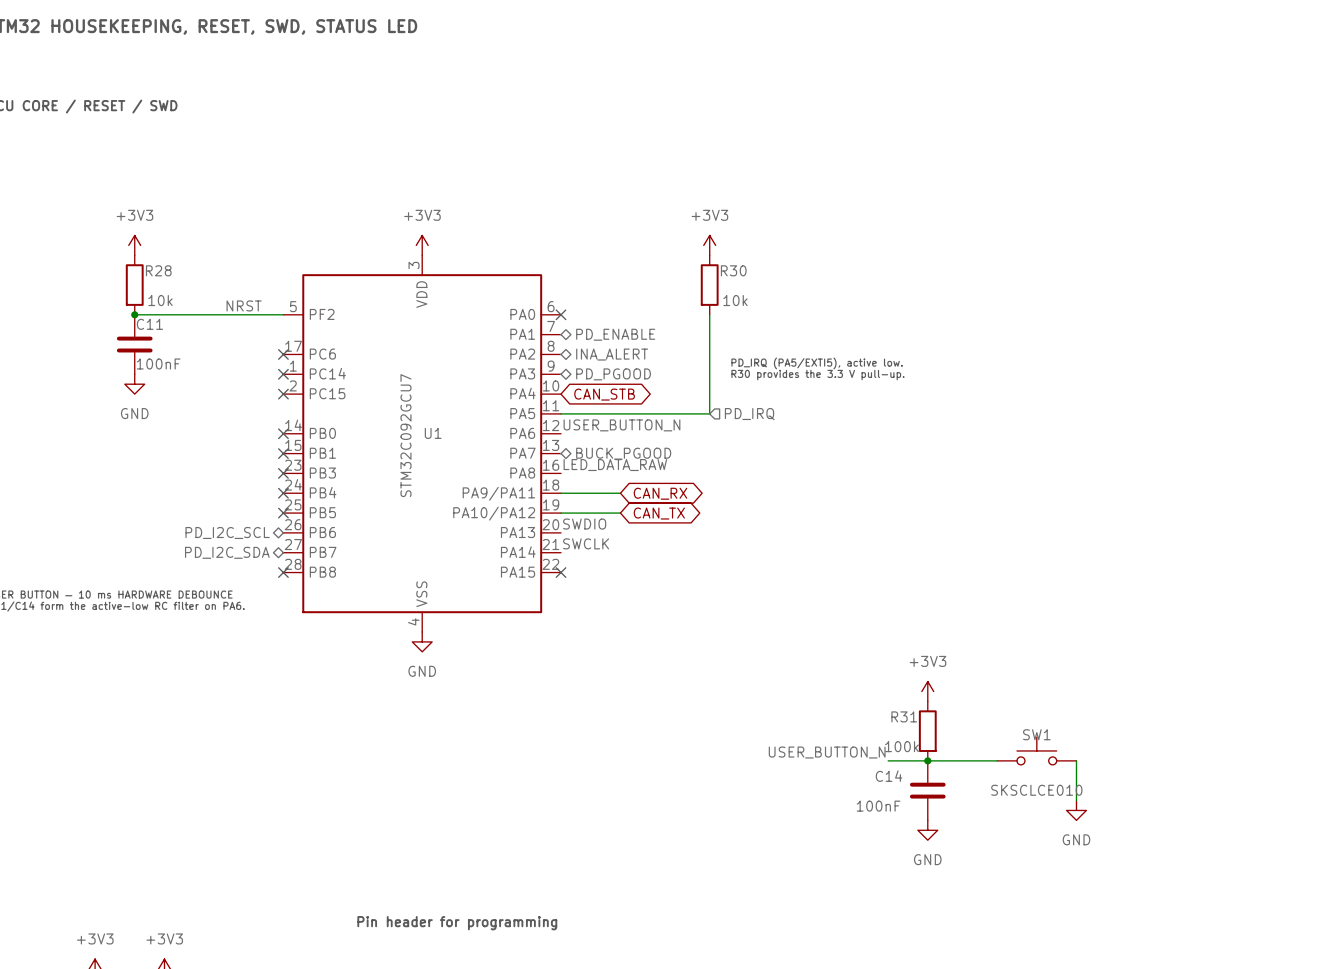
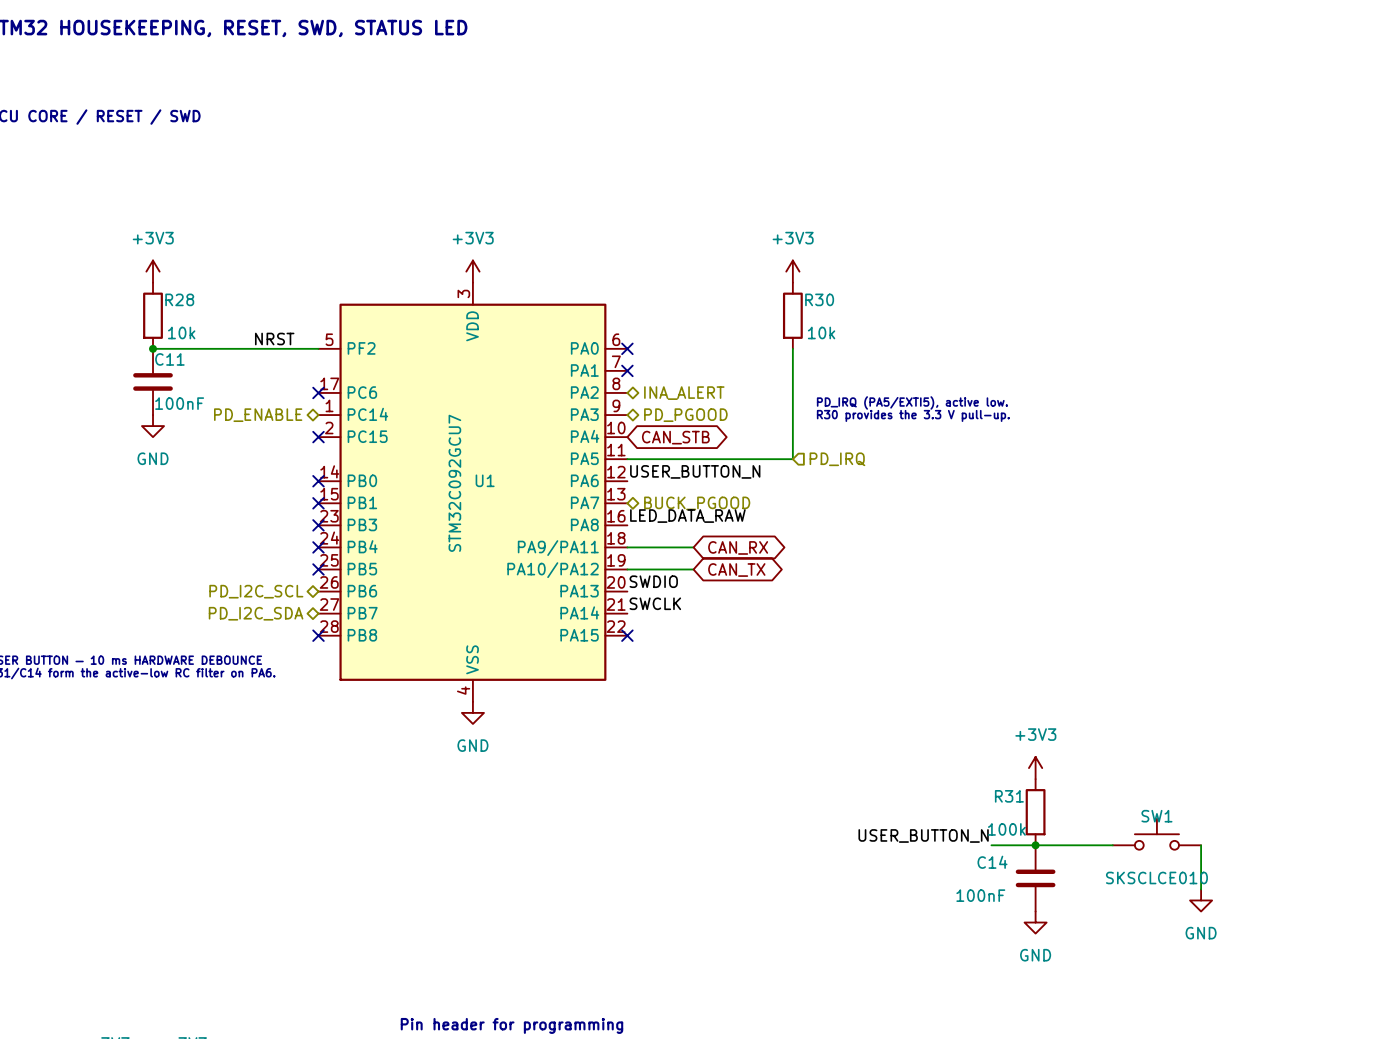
no-connect mark: none -> (627, 370)
hierarchical label: PD_ENABLE (615, 334) -> none
hierarchical label: none -> PD_ENABLE (258, 415)
no-connect mark: (283, 374) -> none

